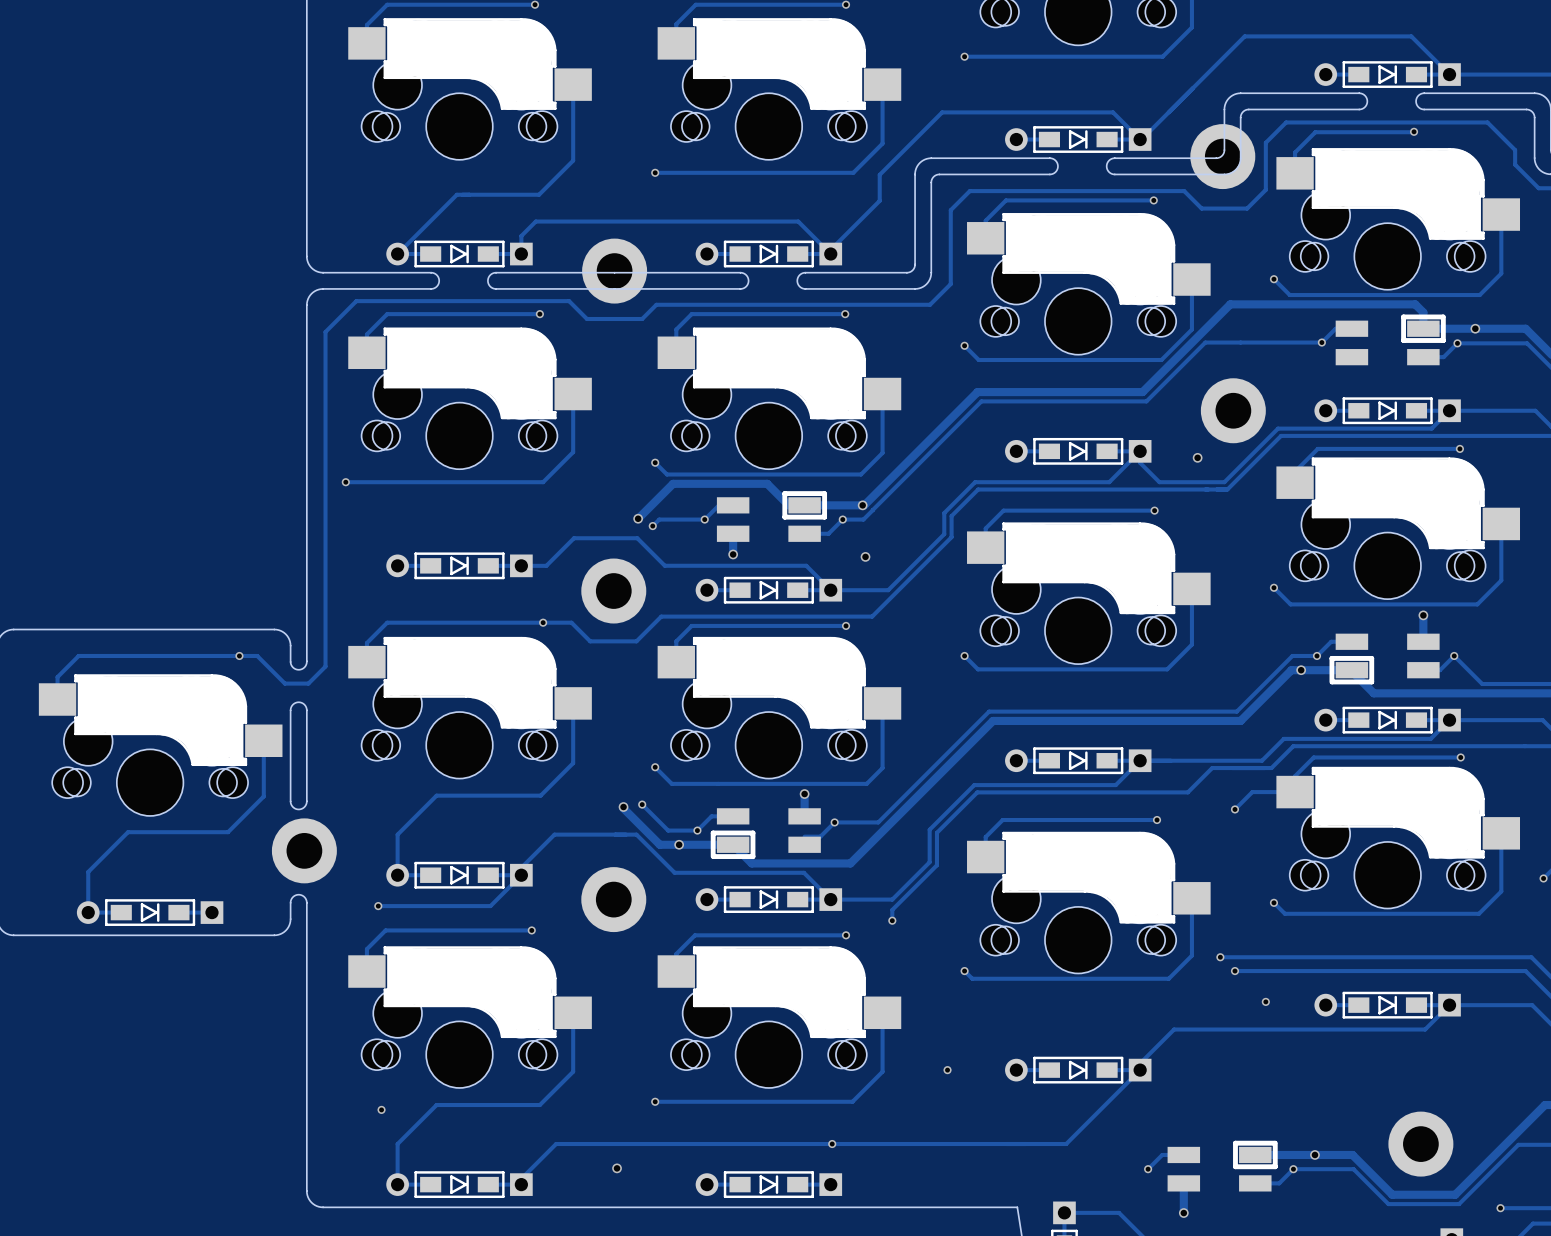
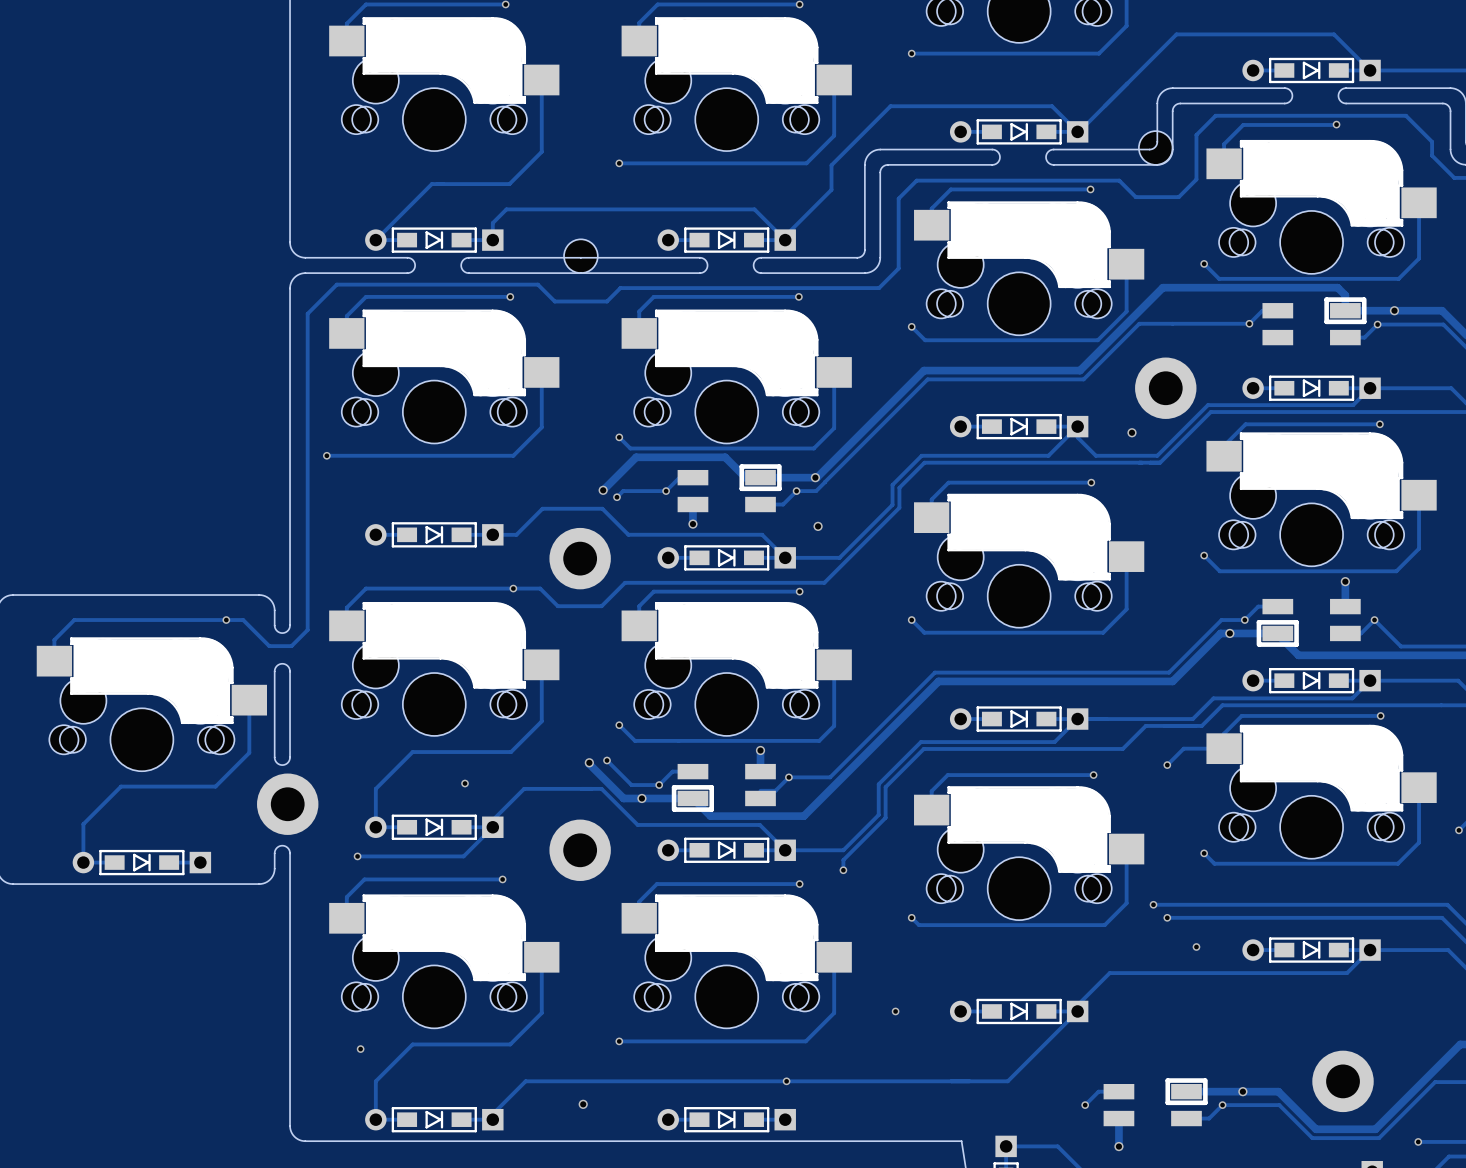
part footprint: [1190, 124, 1256, 190] -> [1138, 131, 1173, 165]
part footprint: [582, 238, 648, 304] -> [564, 239, 598, 274]
via: none -> (465, 783)

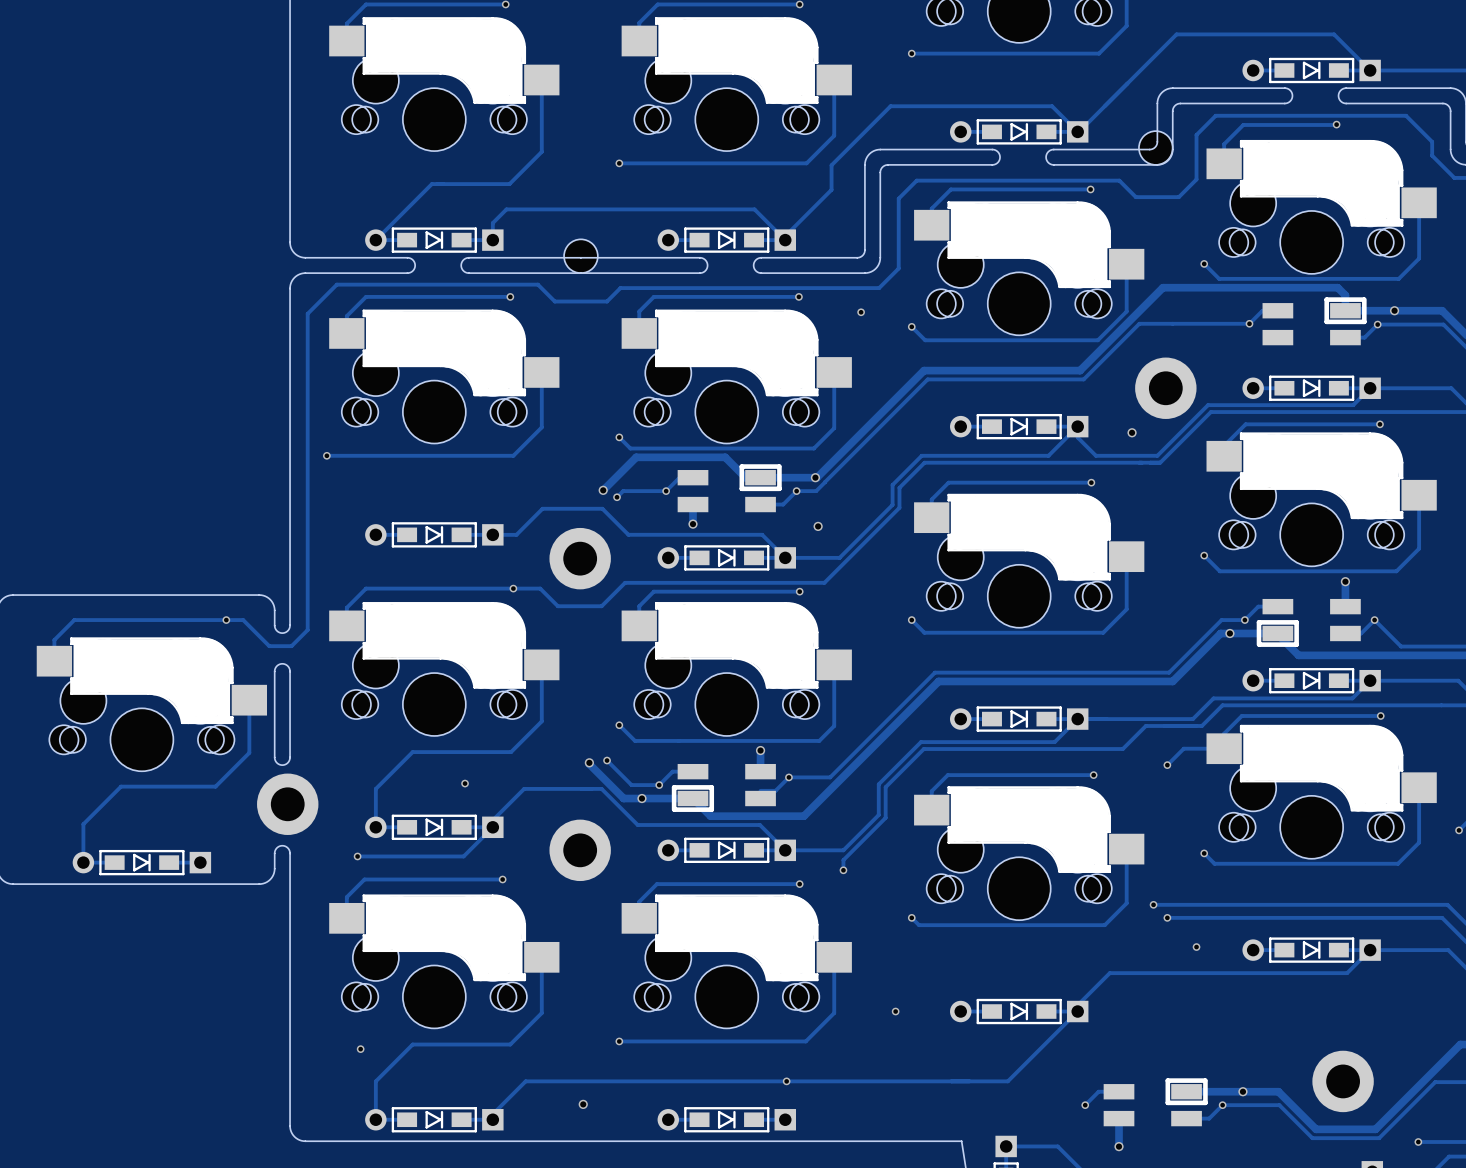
via: none -> (861, 312)

